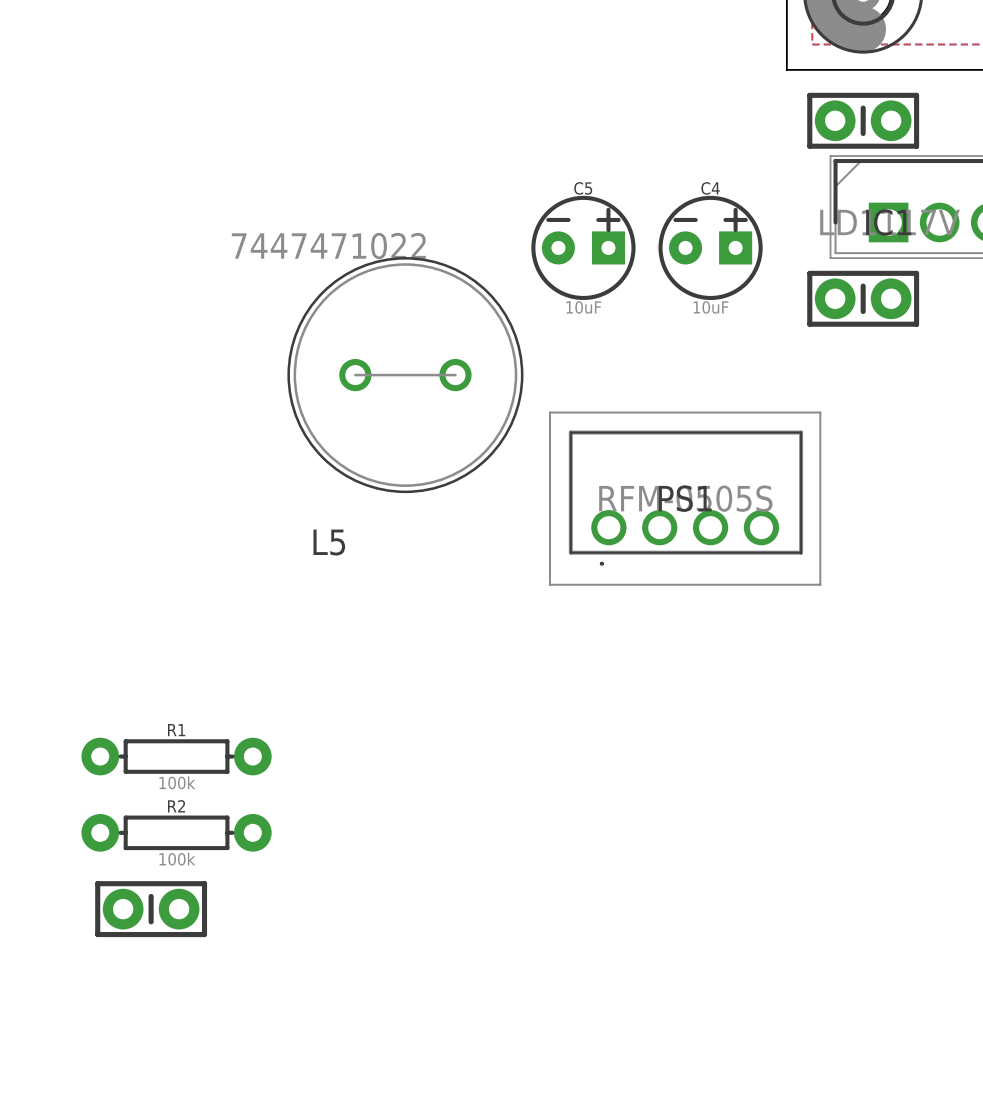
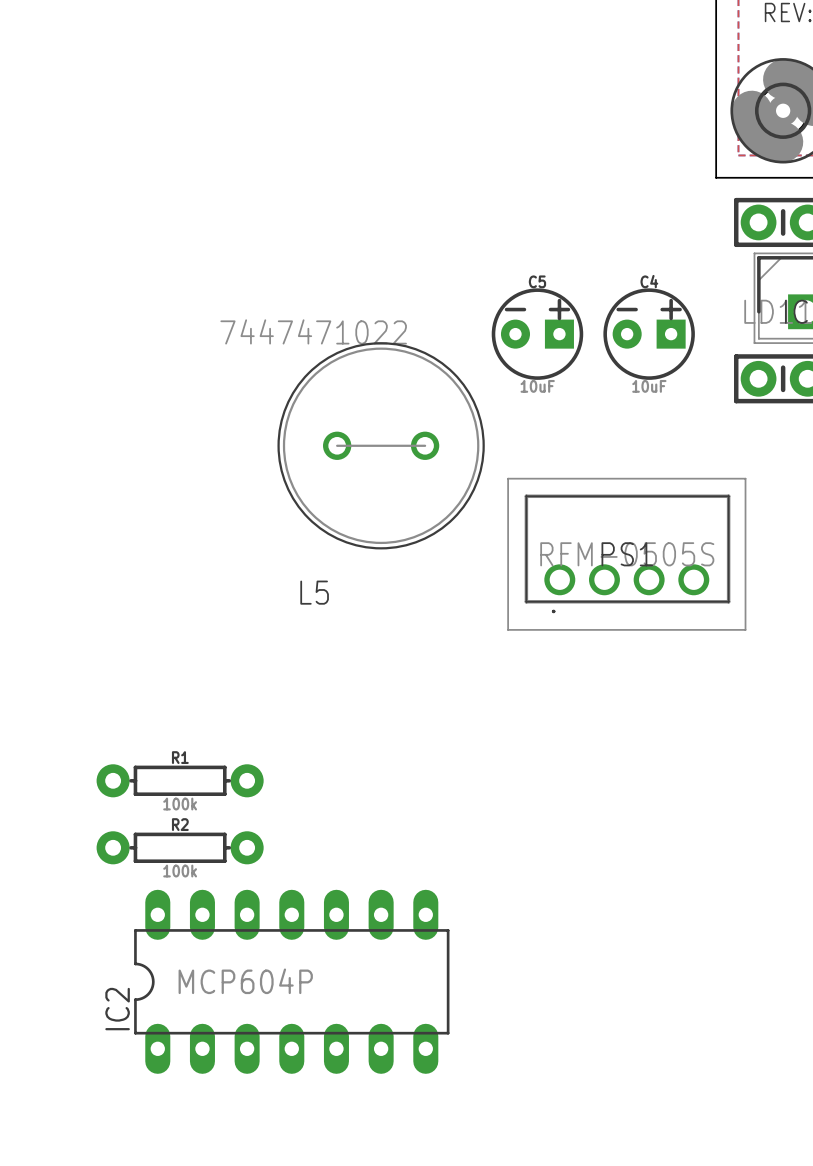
part: (151, 909) -> none
IC2: none -> MCP604P (291, 981)

